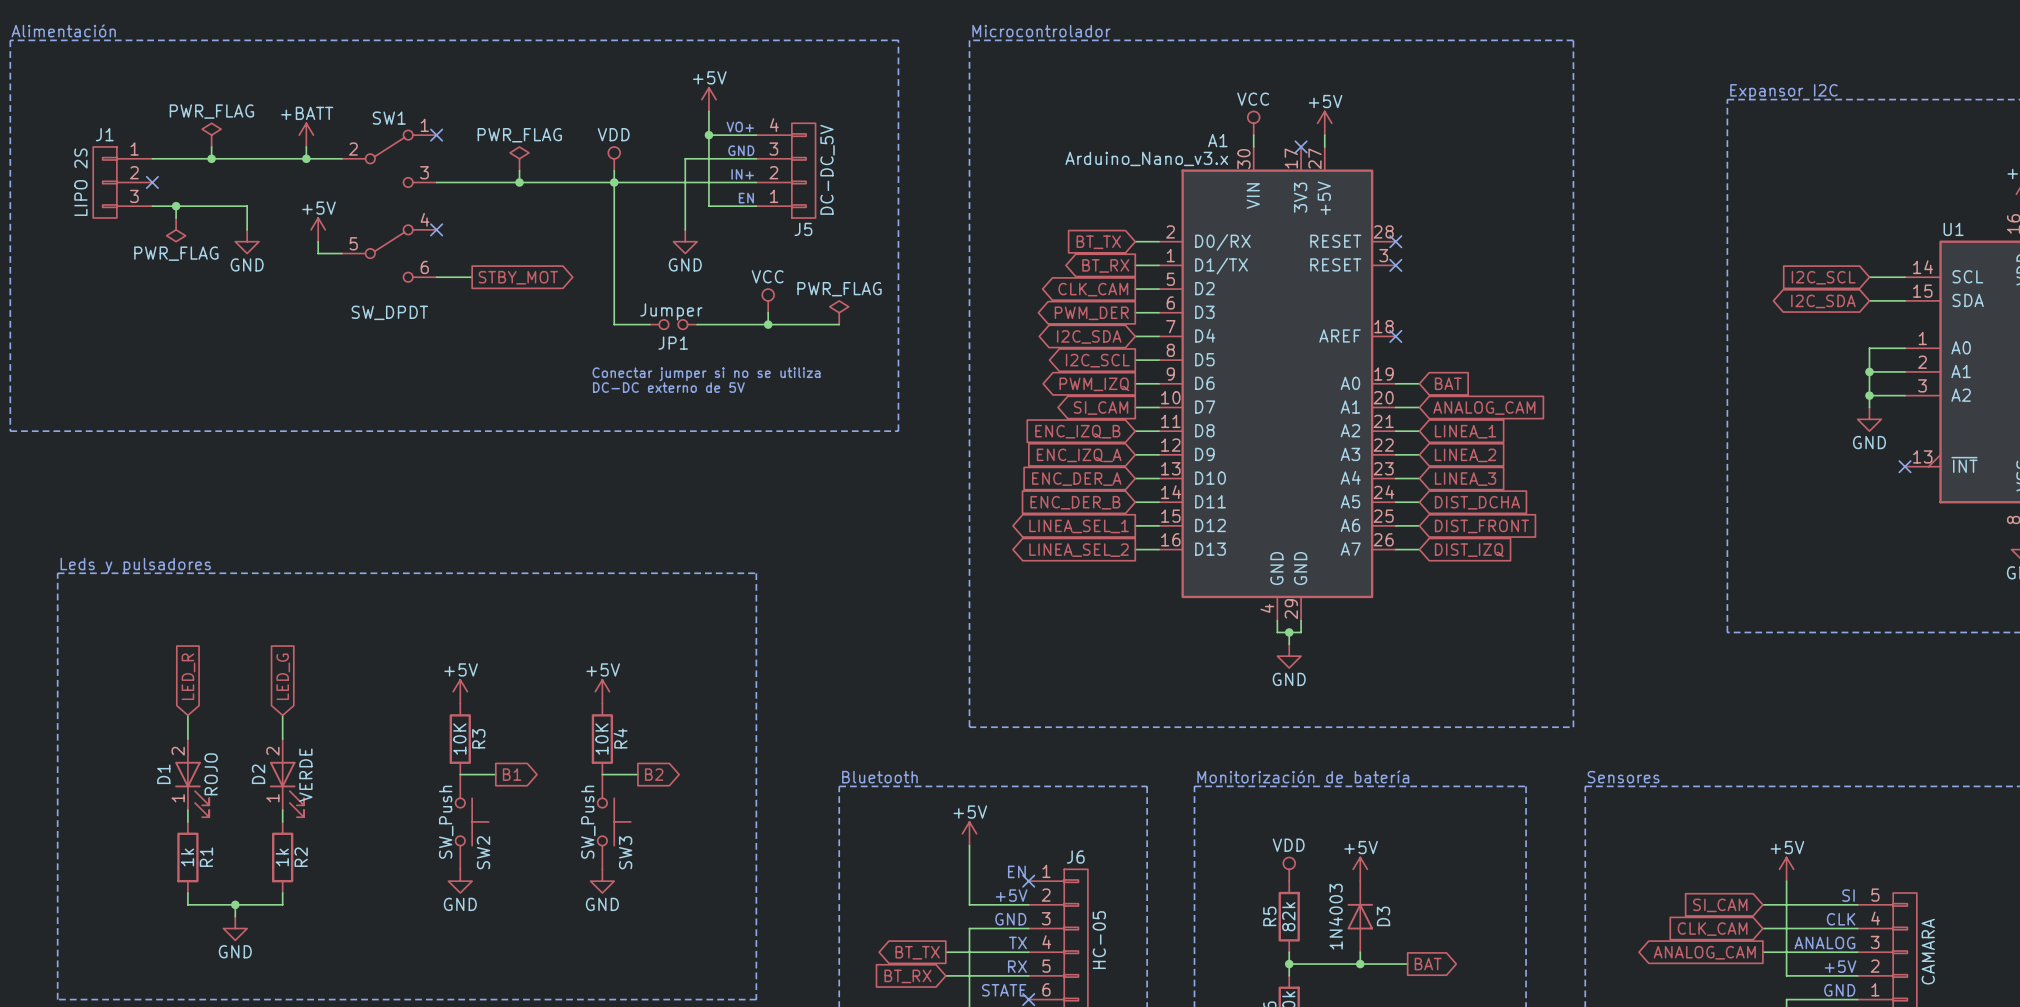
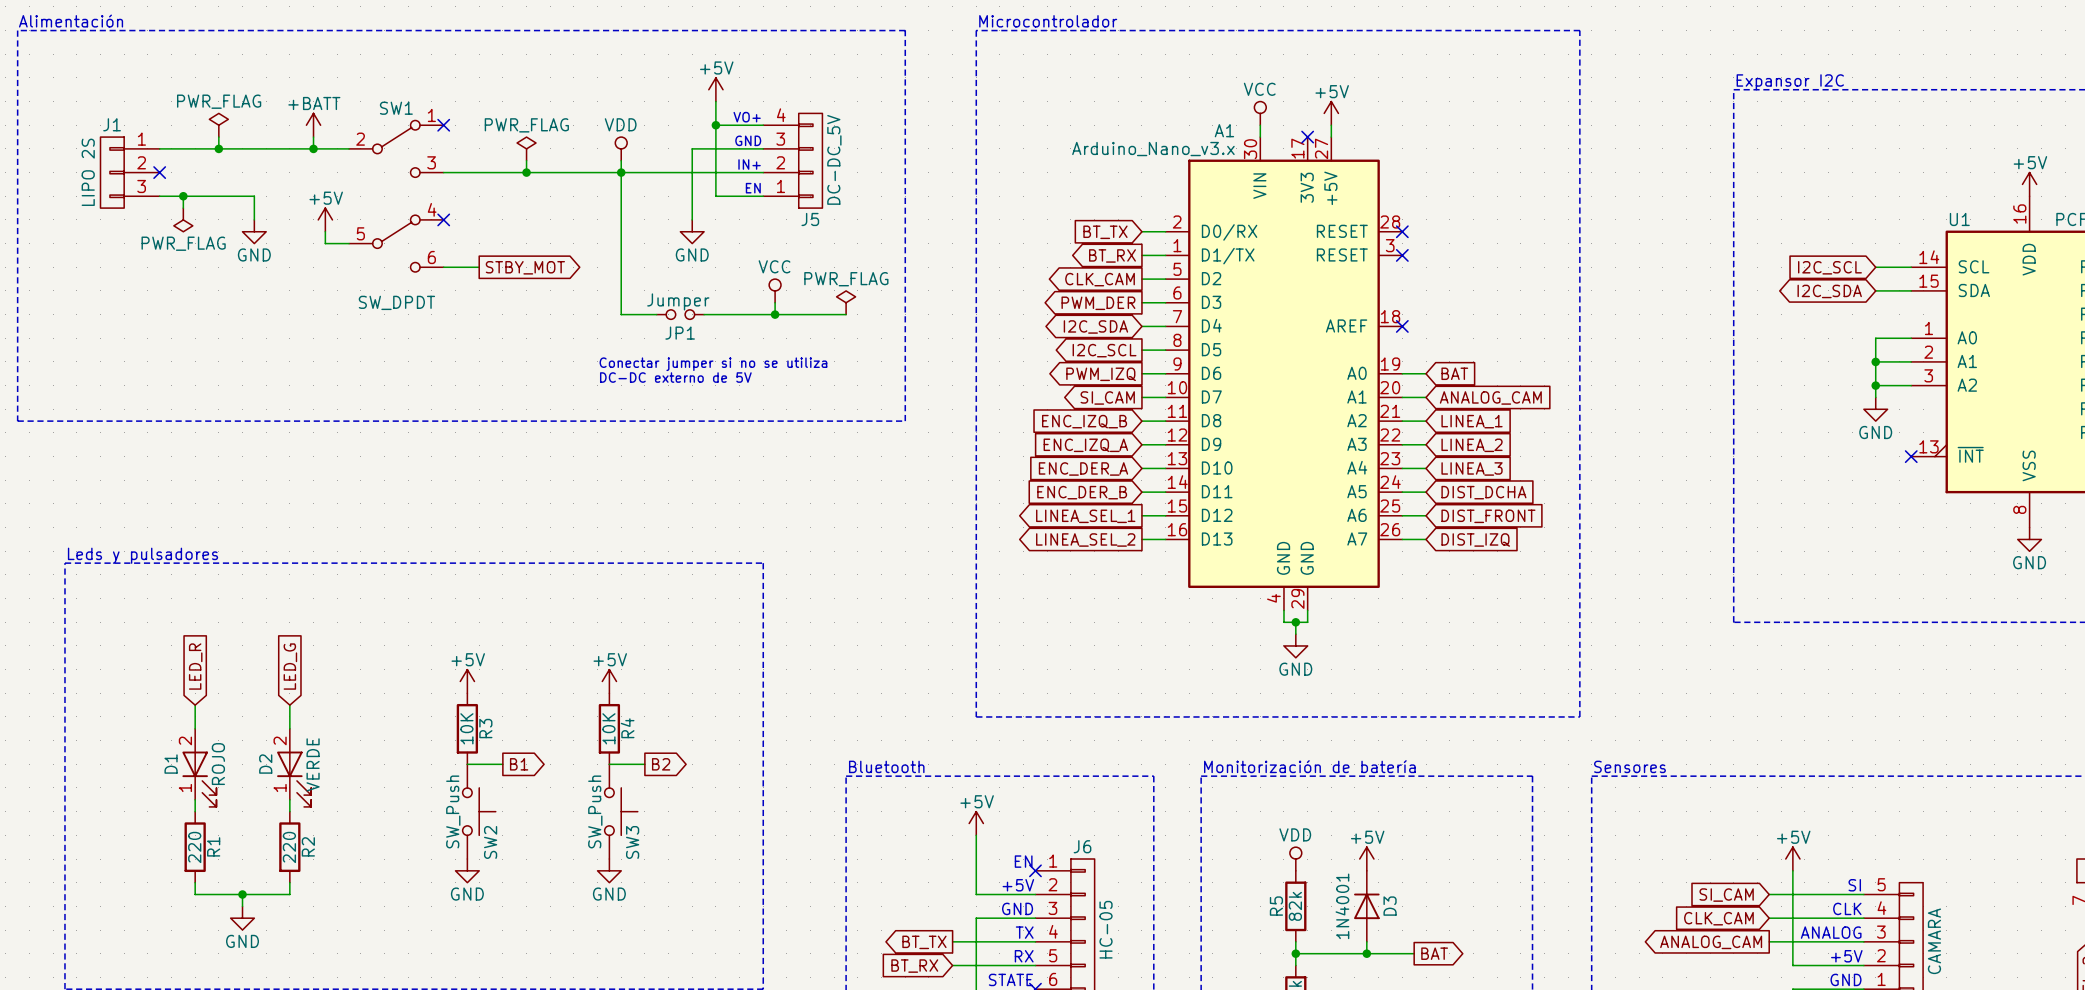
R1 value: 1k (187, 857) -> 220 (194, 847)
R2 value: 1k (282, 857) -> 220 (289, 847)
D3 value: 1N4003 (1335, 916) -> 1N4001 (1342, 906)

